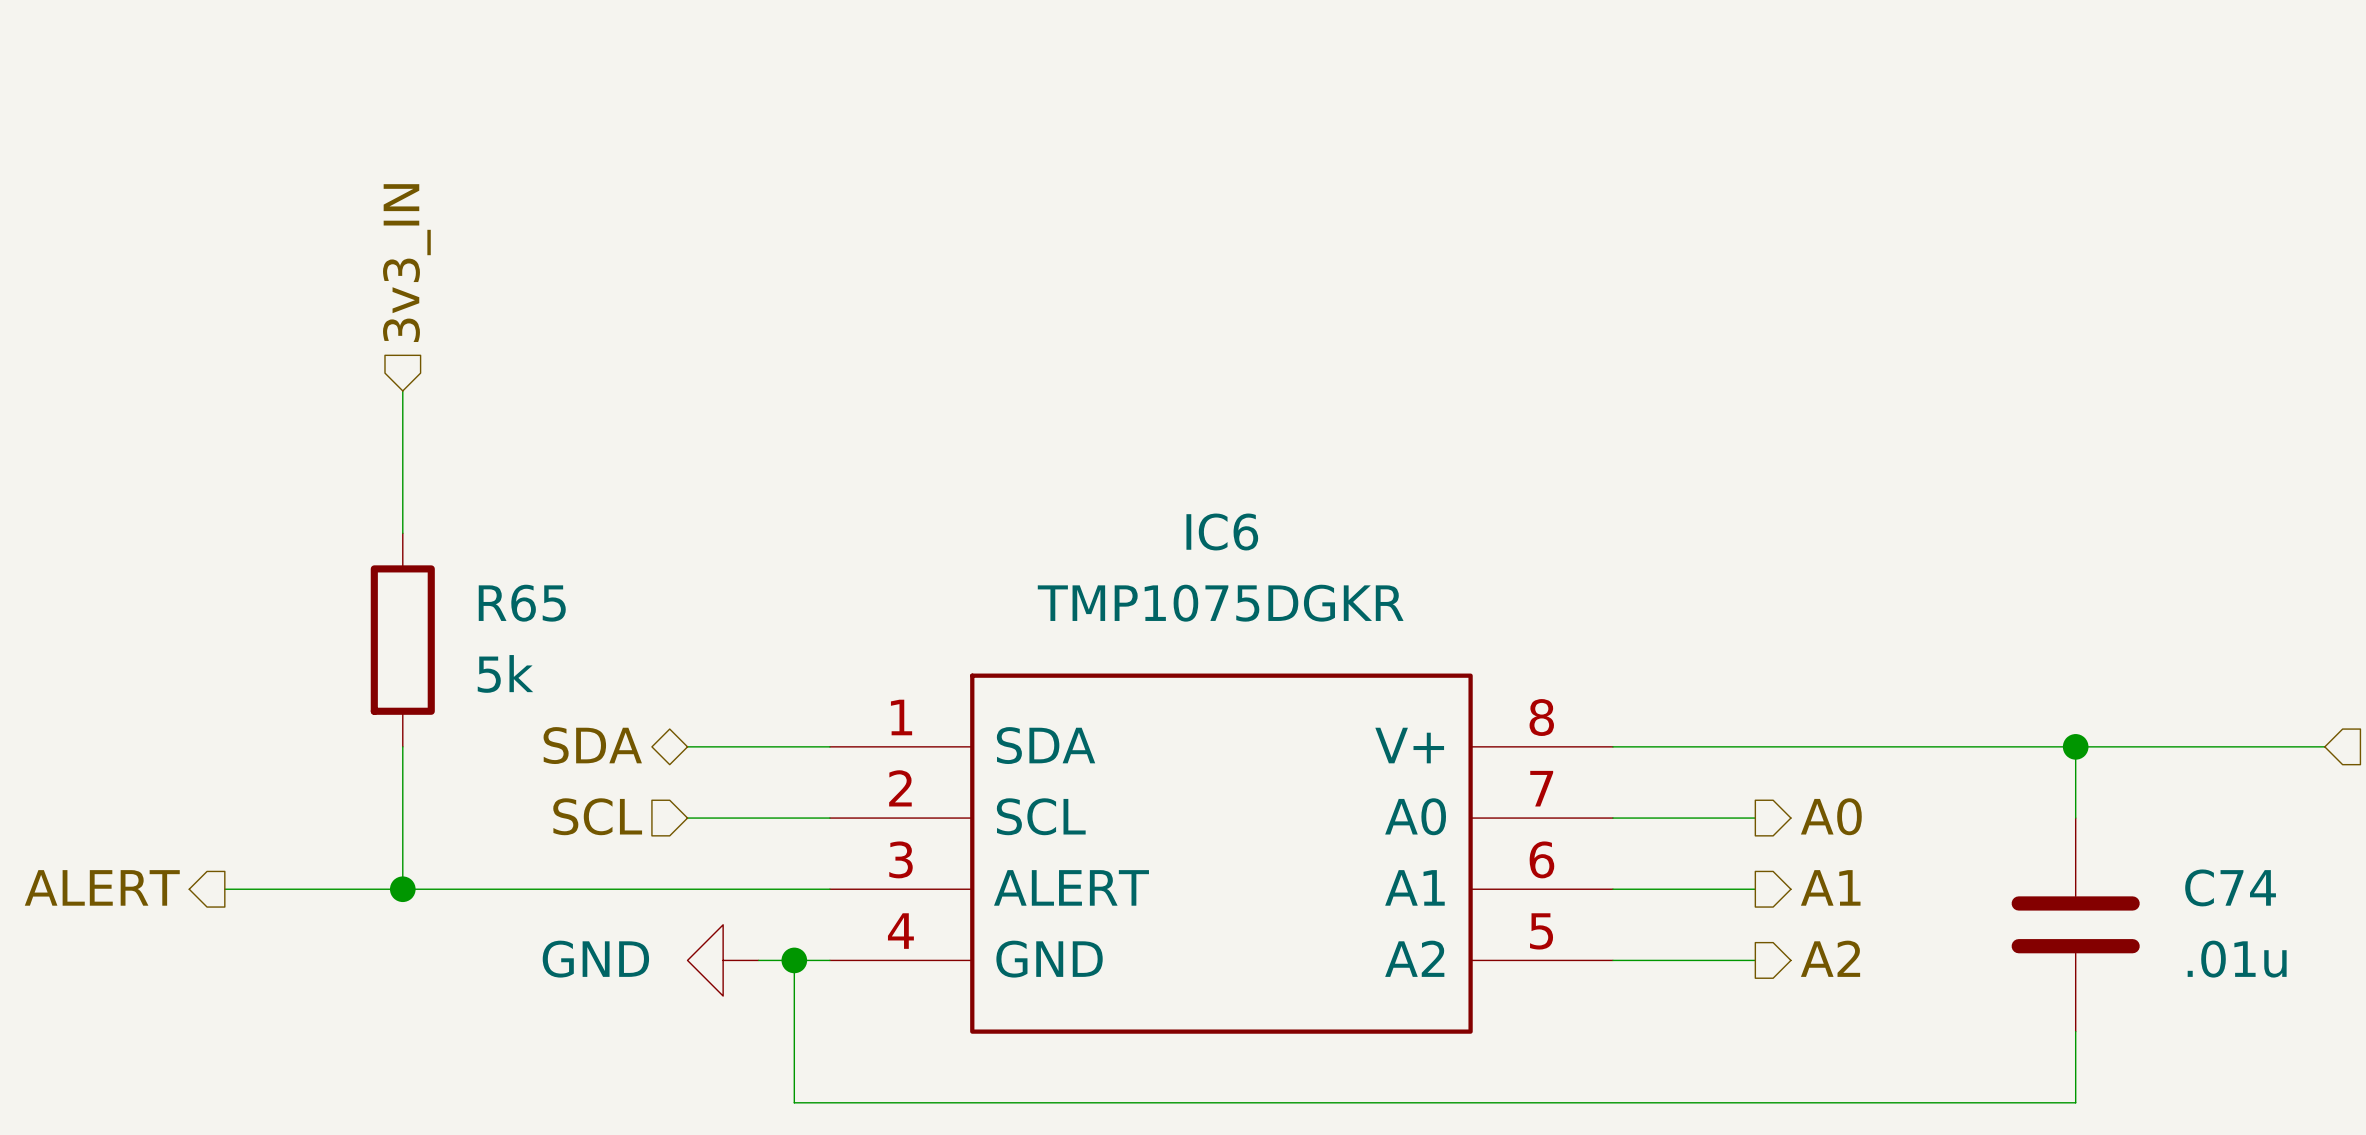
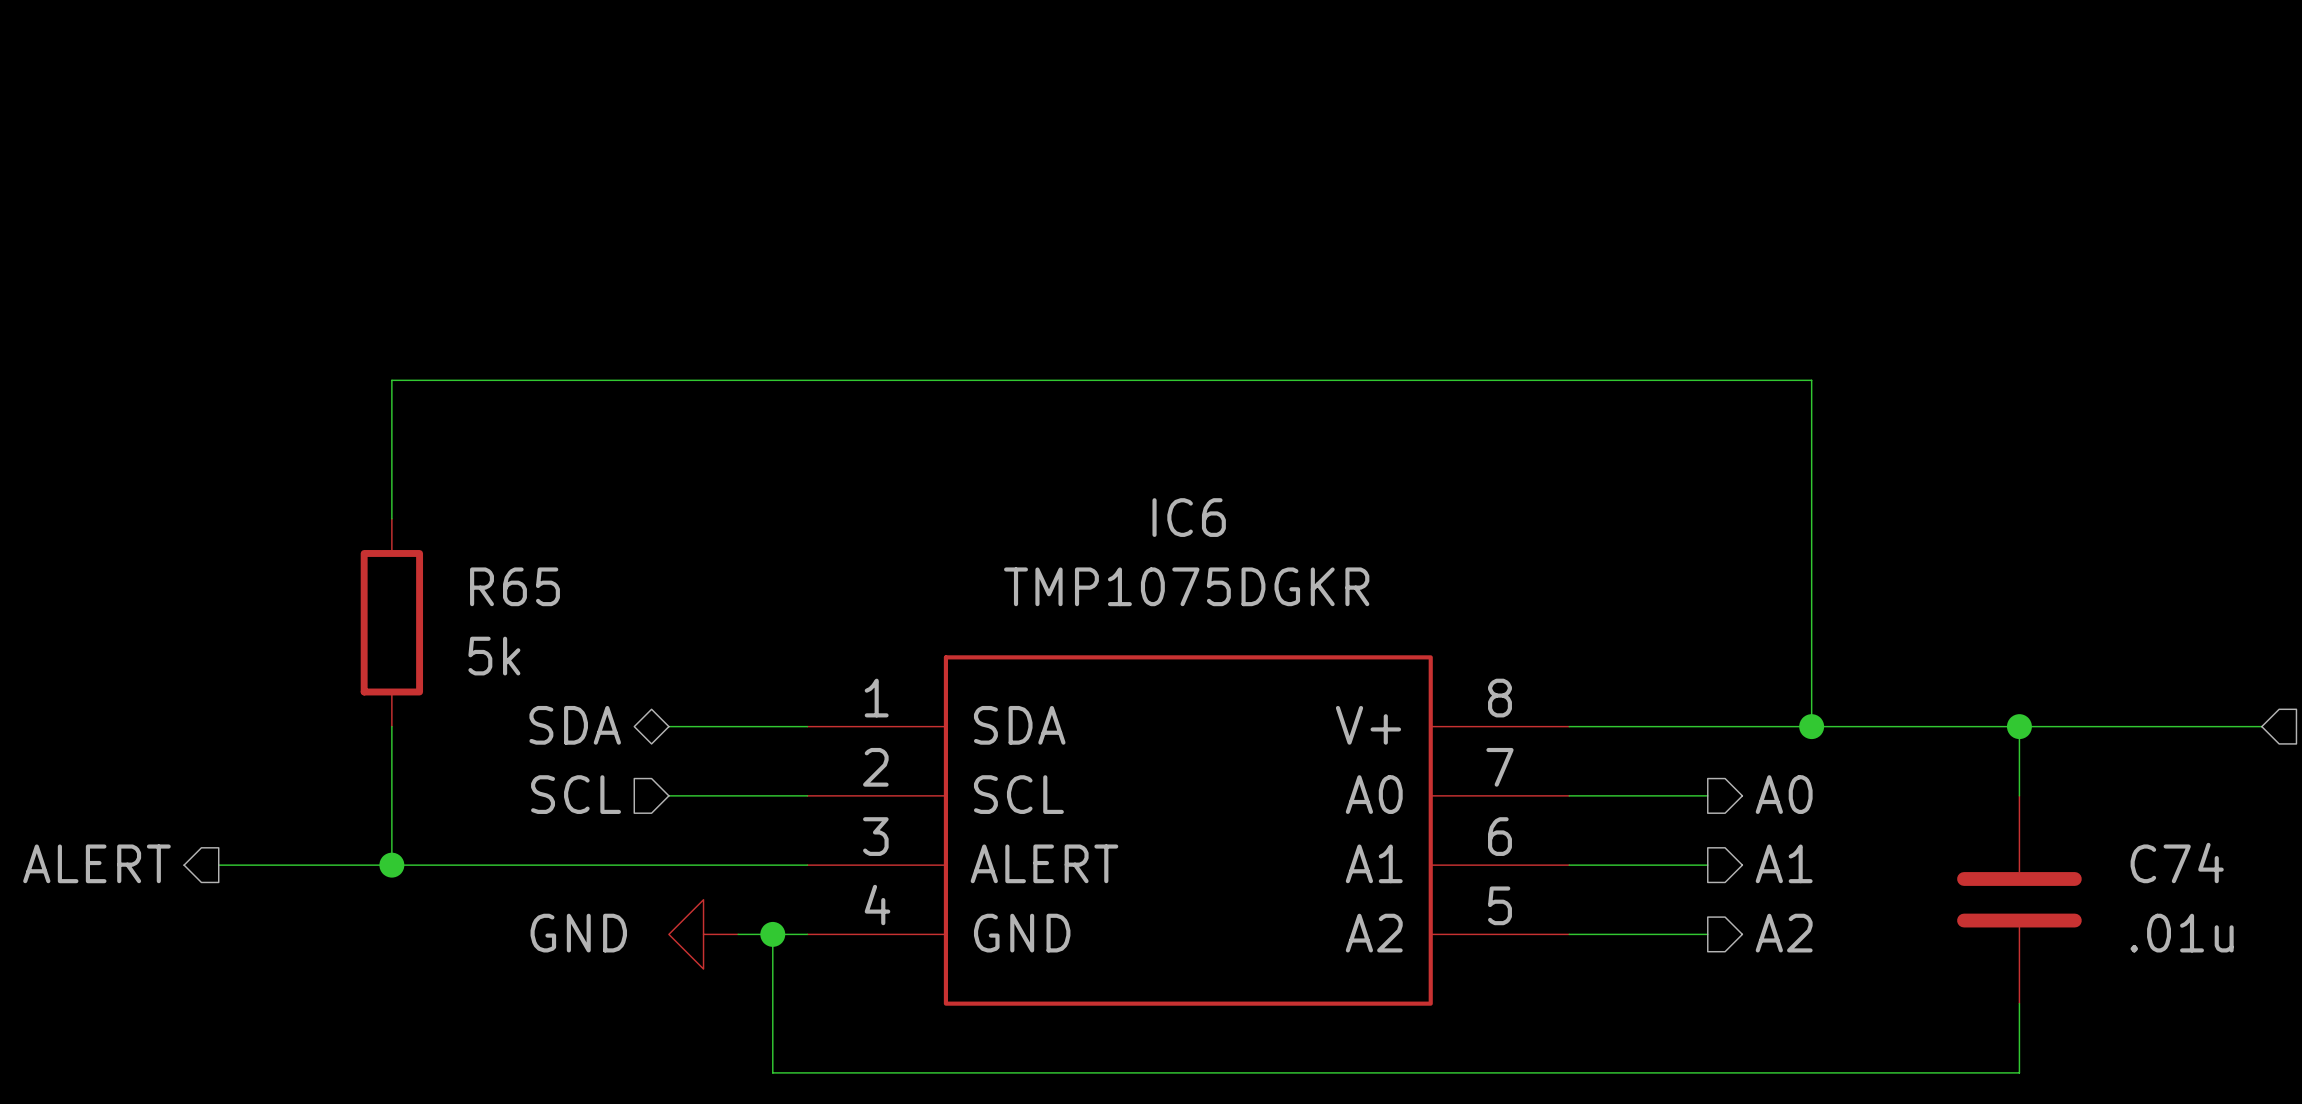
hierarchical label: 3v3_IN (406, 263) -> none
wire: none -> (391, 380) (1811, 380) (1811, 726)
junction: none -> (1811, 726)

